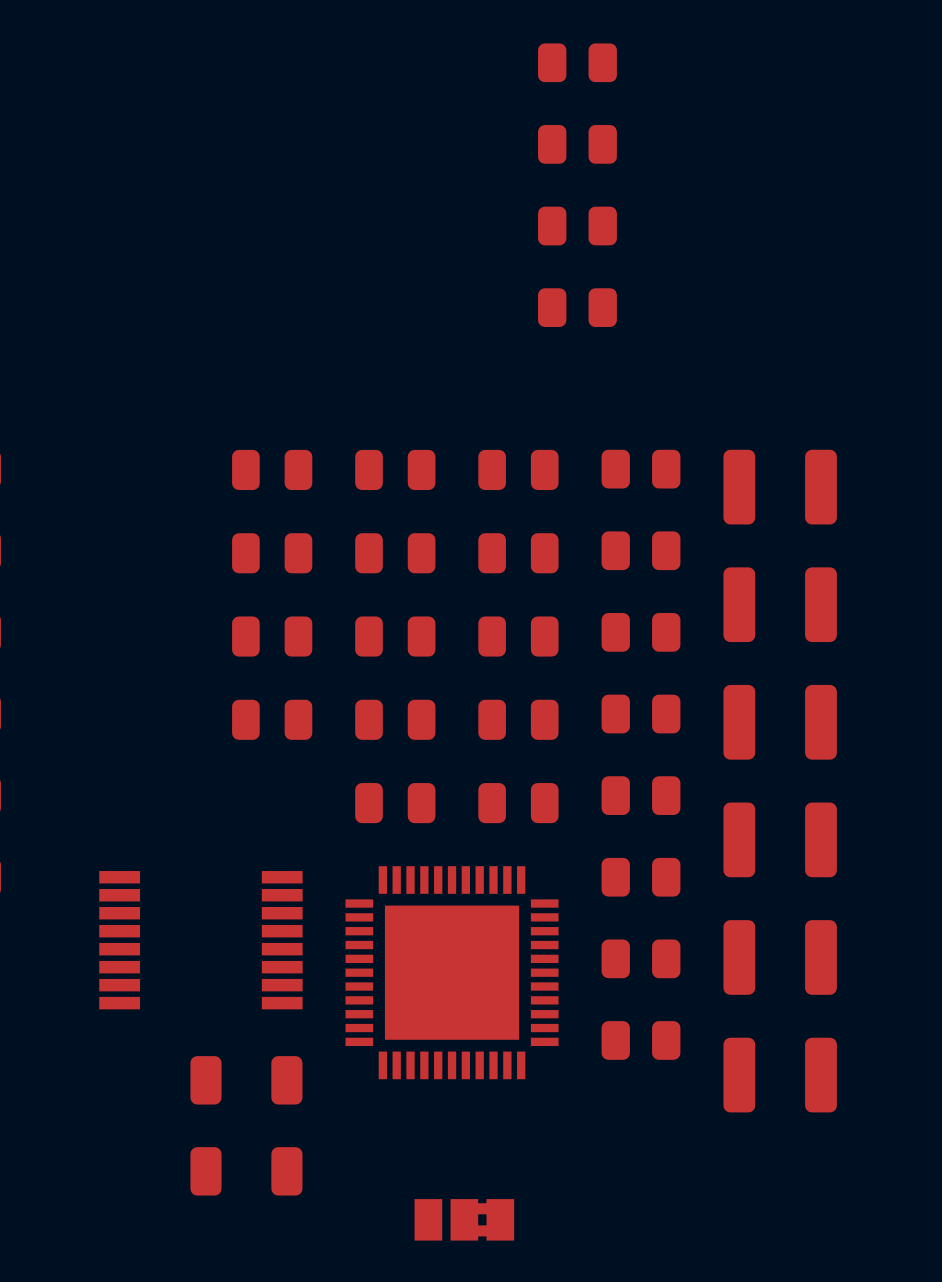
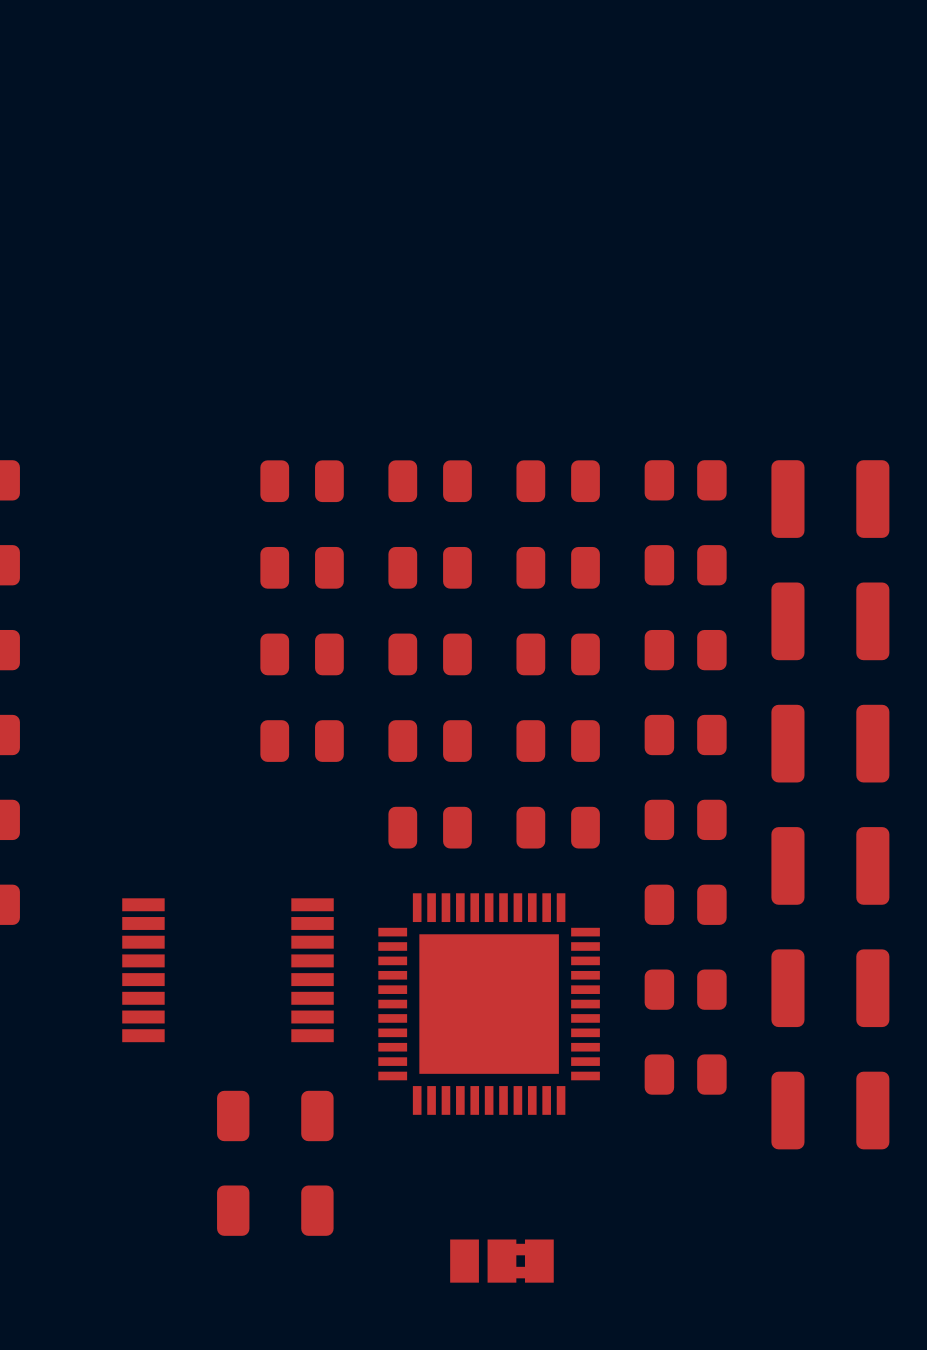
part: (577, 62) -> none
part: (577, 144) -> none
part: (577, 226) -> none
part: (577, 307) -> none

